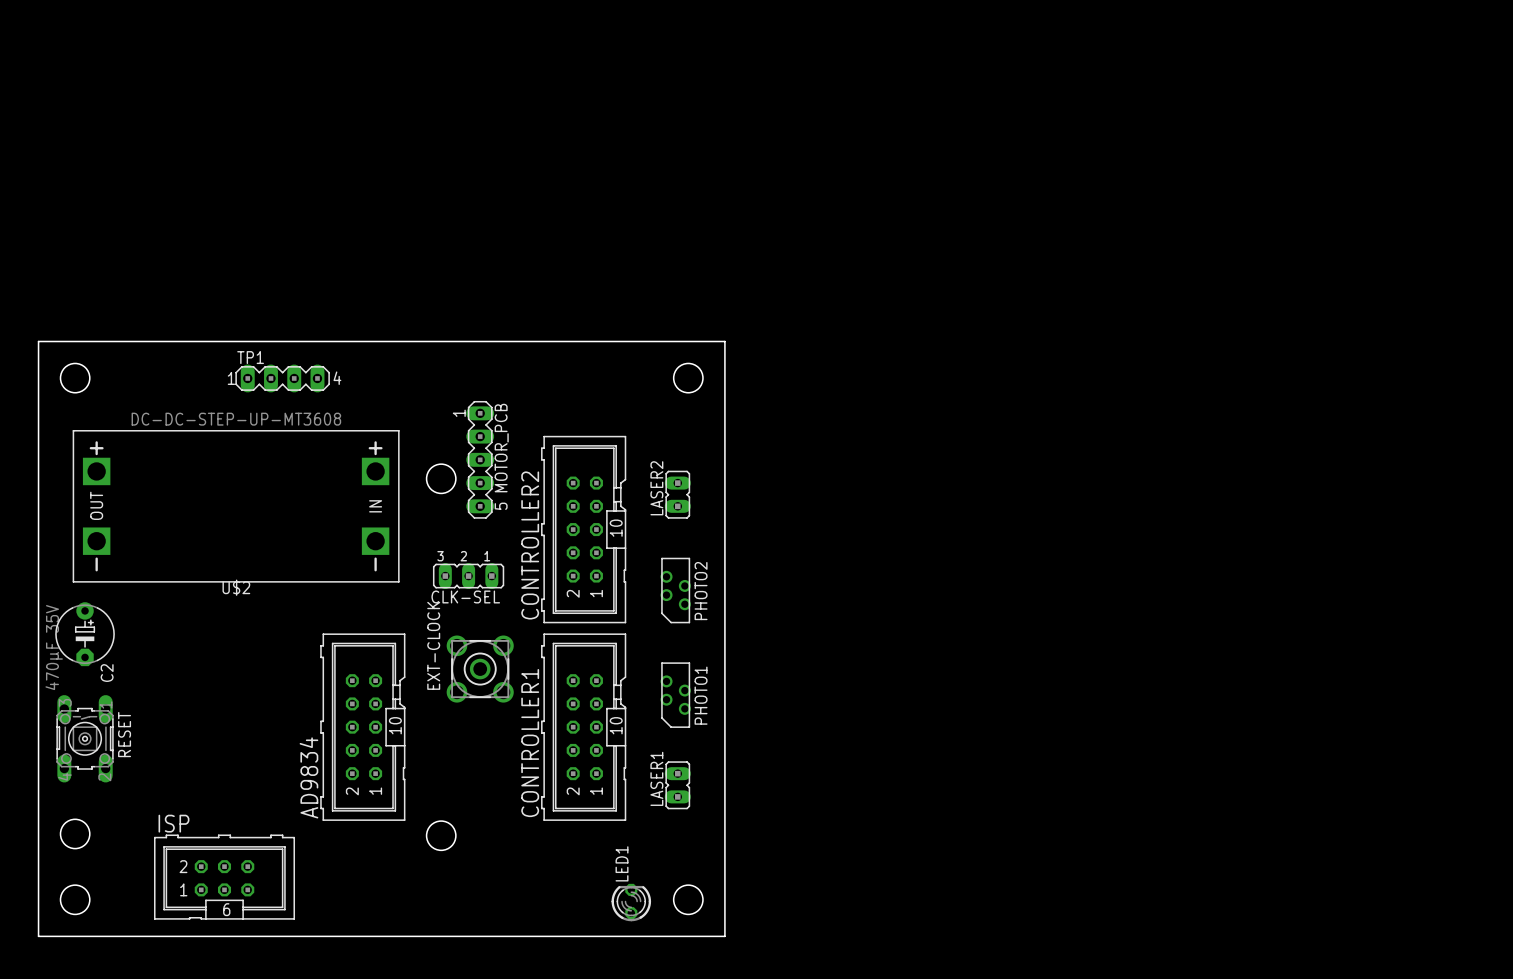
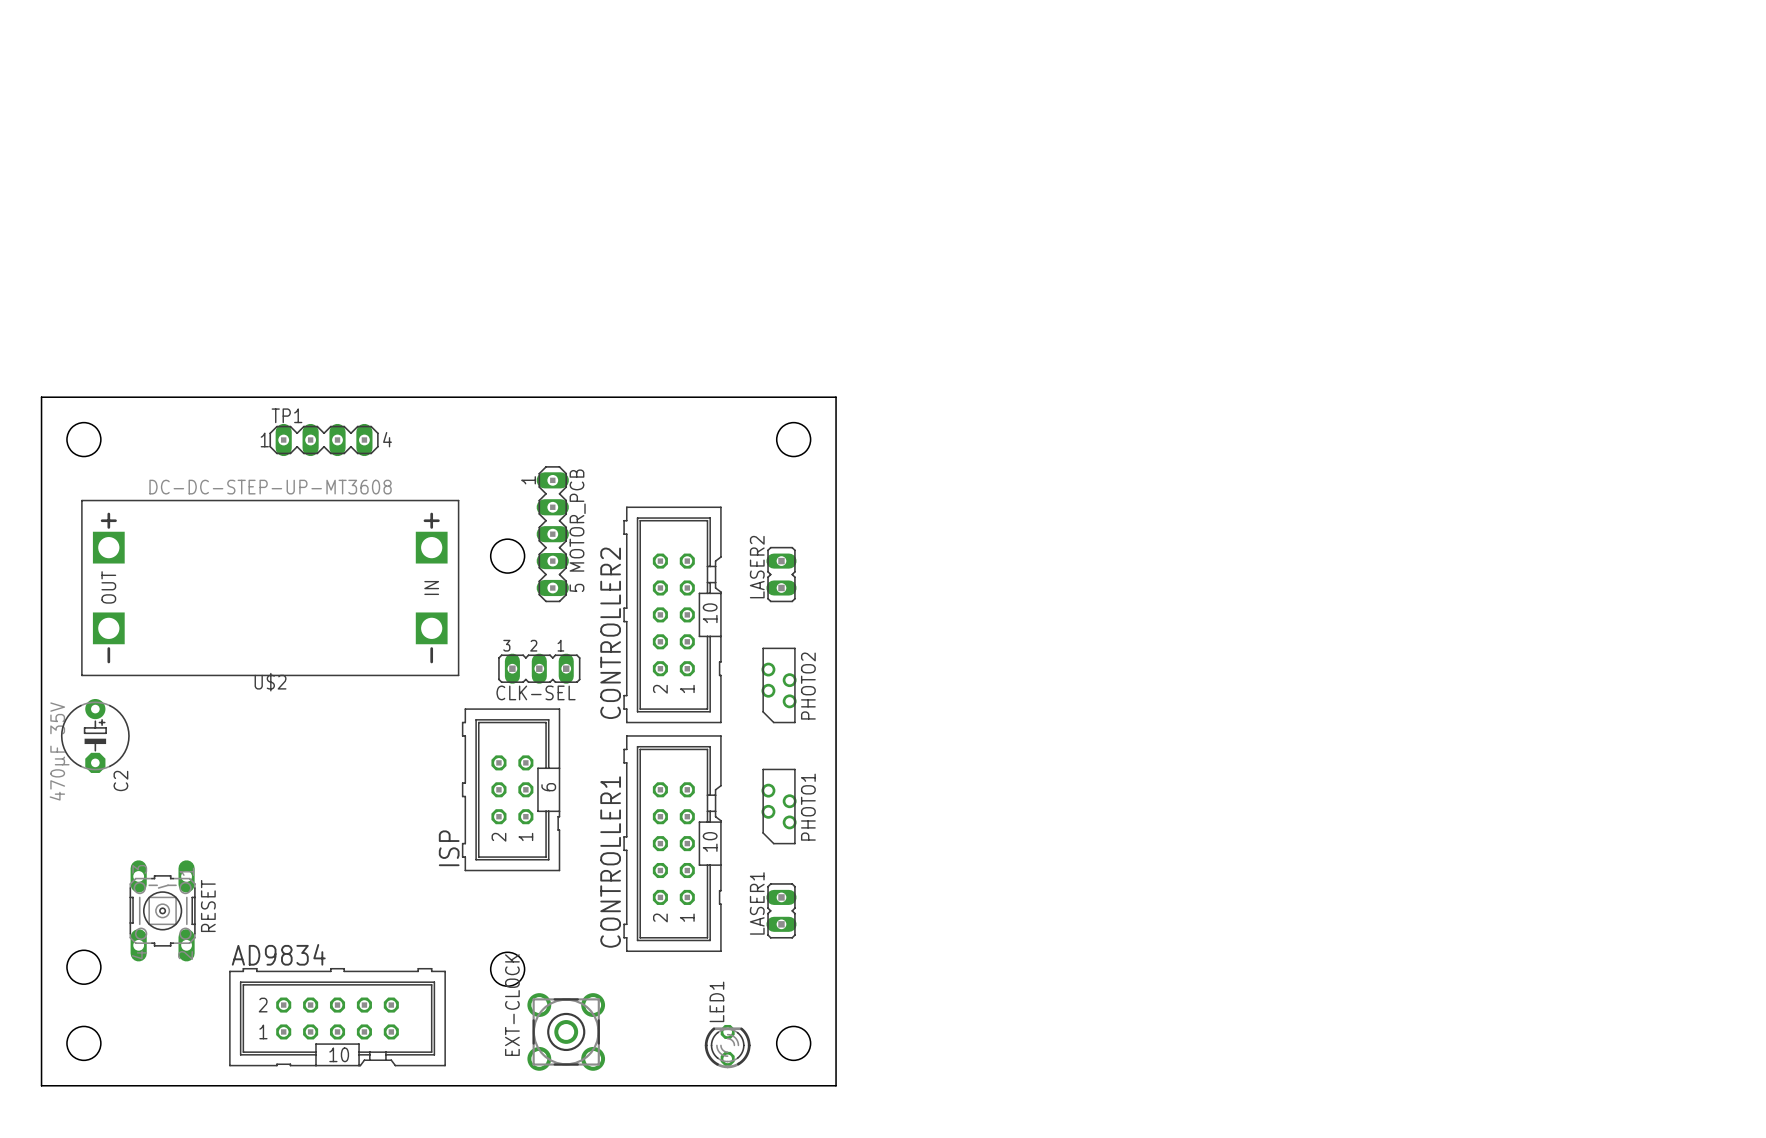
EXT-CLOCK position: (480, 669) -> (566, 1031)
ISP: none -> (511, 789)
AD9834 rotation: 0° (362, 727) -> 90° clockwise (337, 1017)
AD9834 position: (362, 727) -> (337, 1017)
RESET position: (85, 738) -> (162, 910)
ISP: (224, 877) -> none

